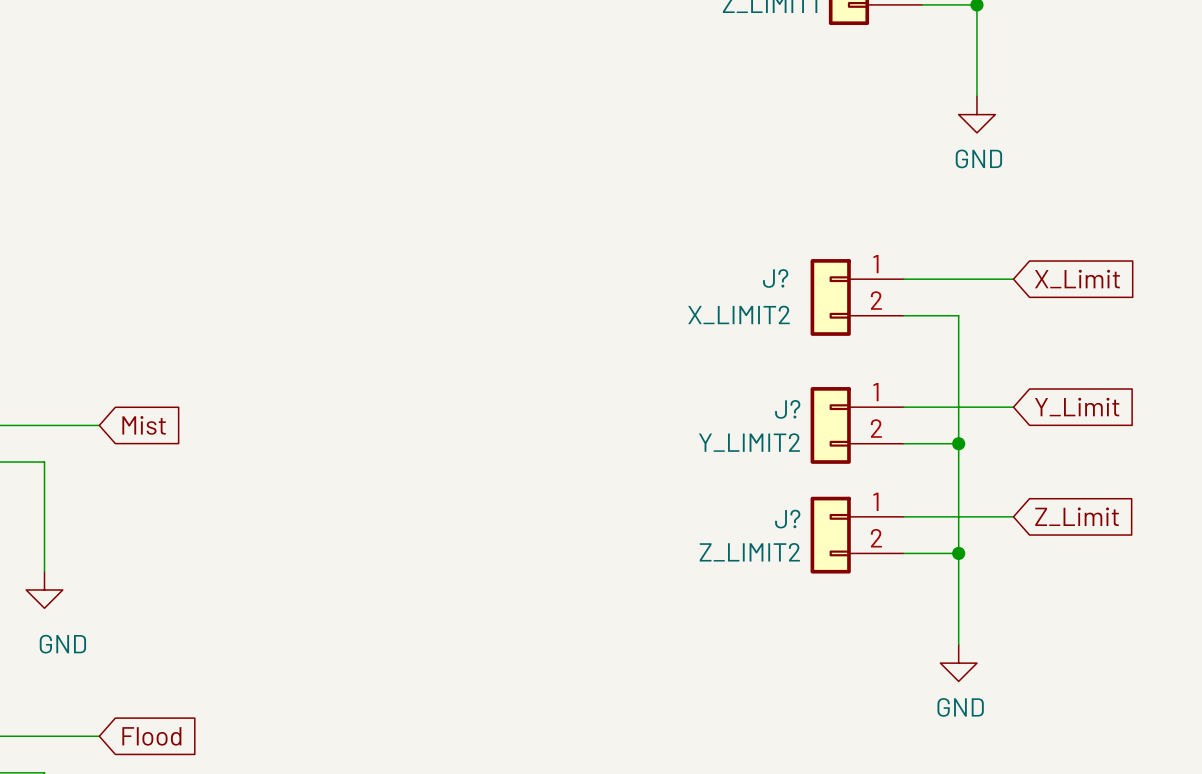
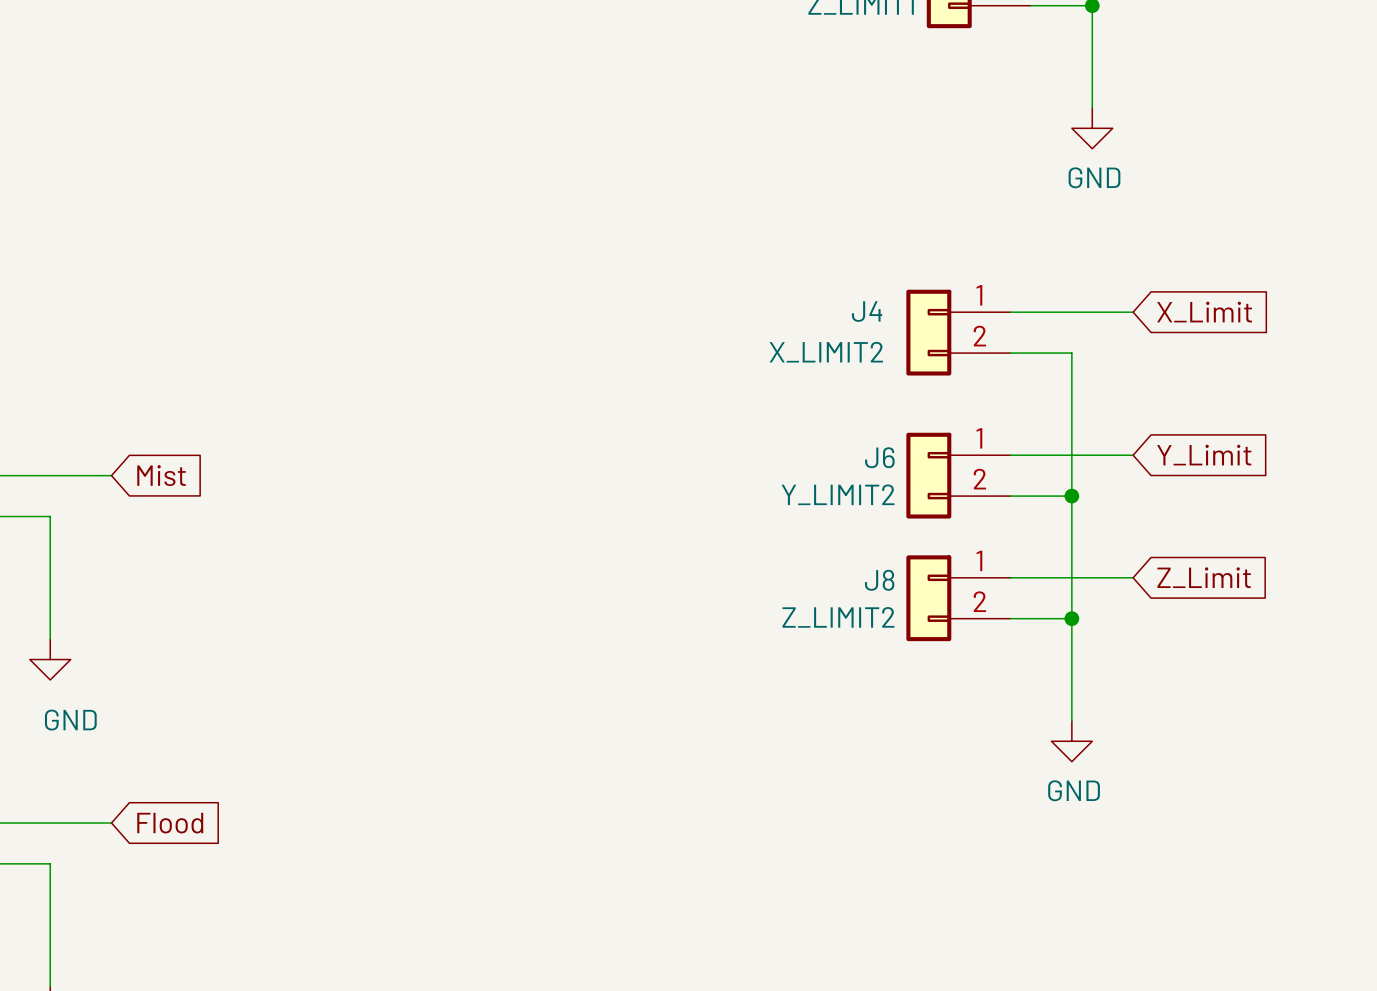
J? name: J? (775, 278) -> J4 (867, 311)
J? name: J? (787, 409) -> J6 (879, 457)
J? name: J? (787, 519) -> J8 (879, 580)

